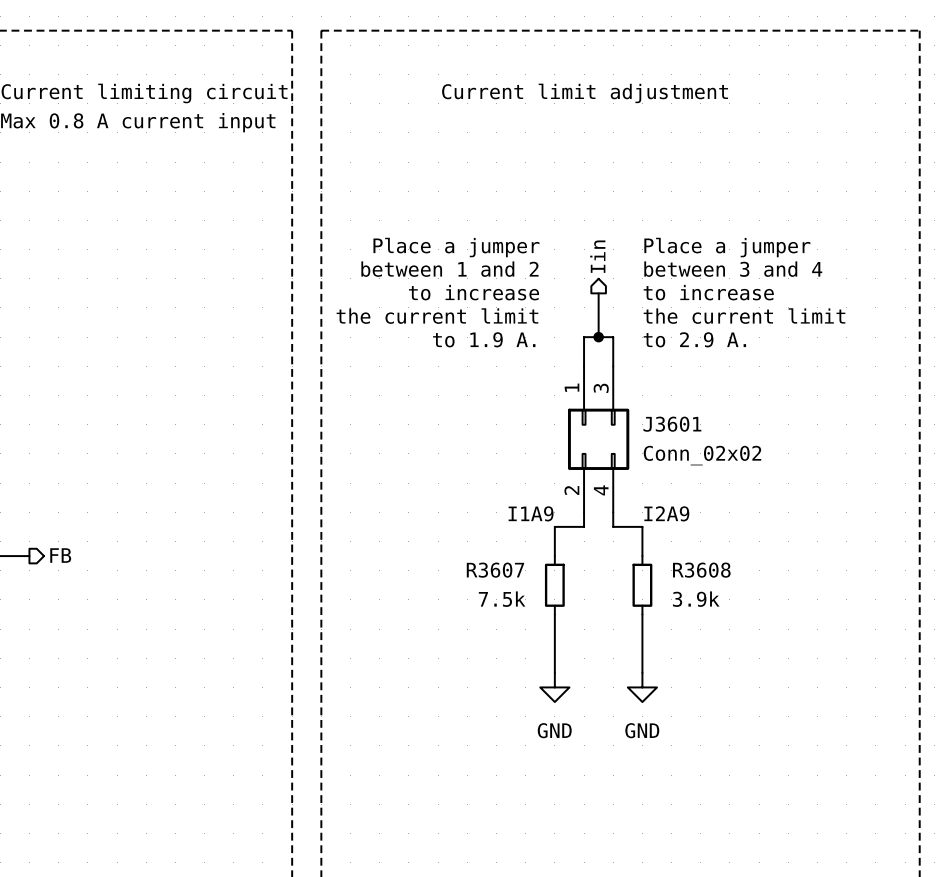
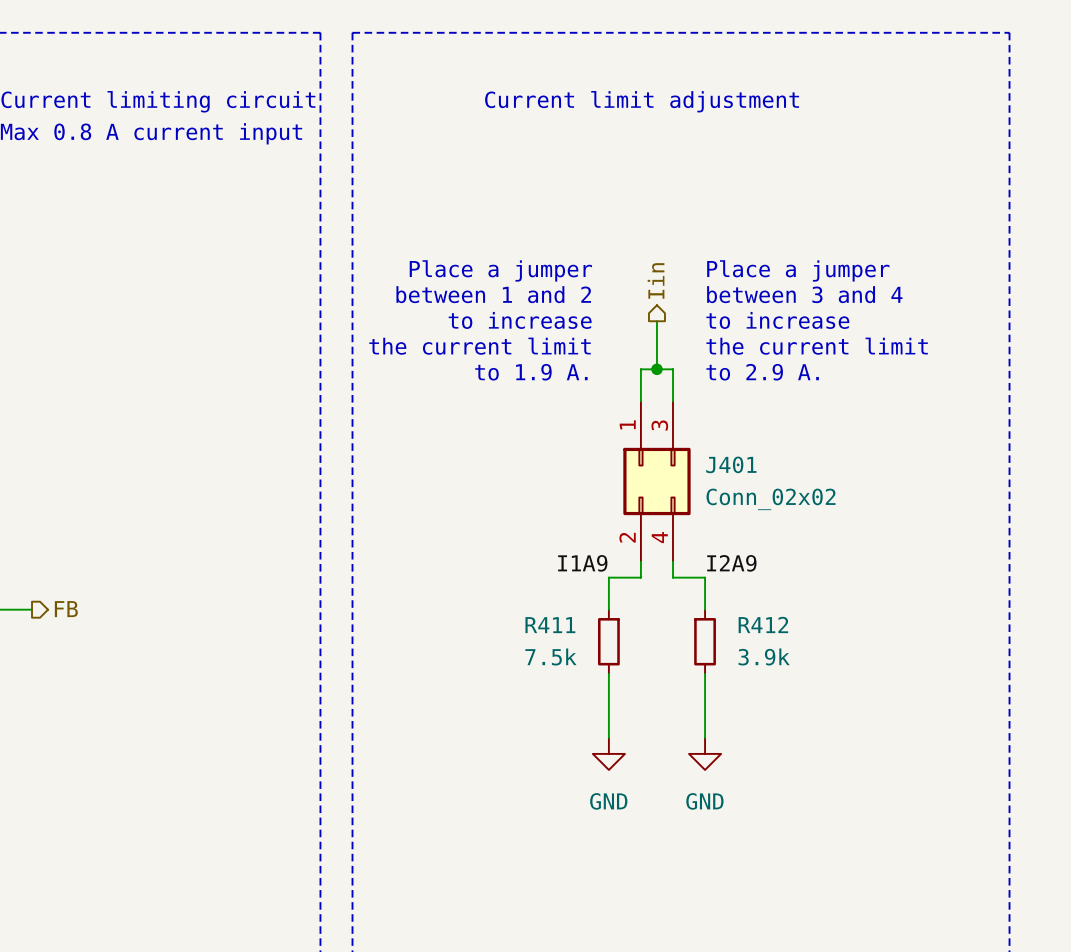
J3601 name: J3601 (672, 424) -> J401 (731, 464)
R3607 name: R3607 (495, 570) -> R411 (550, 625)
R3608 name: R3608 (701, 570) -> R412 (763, 624)

